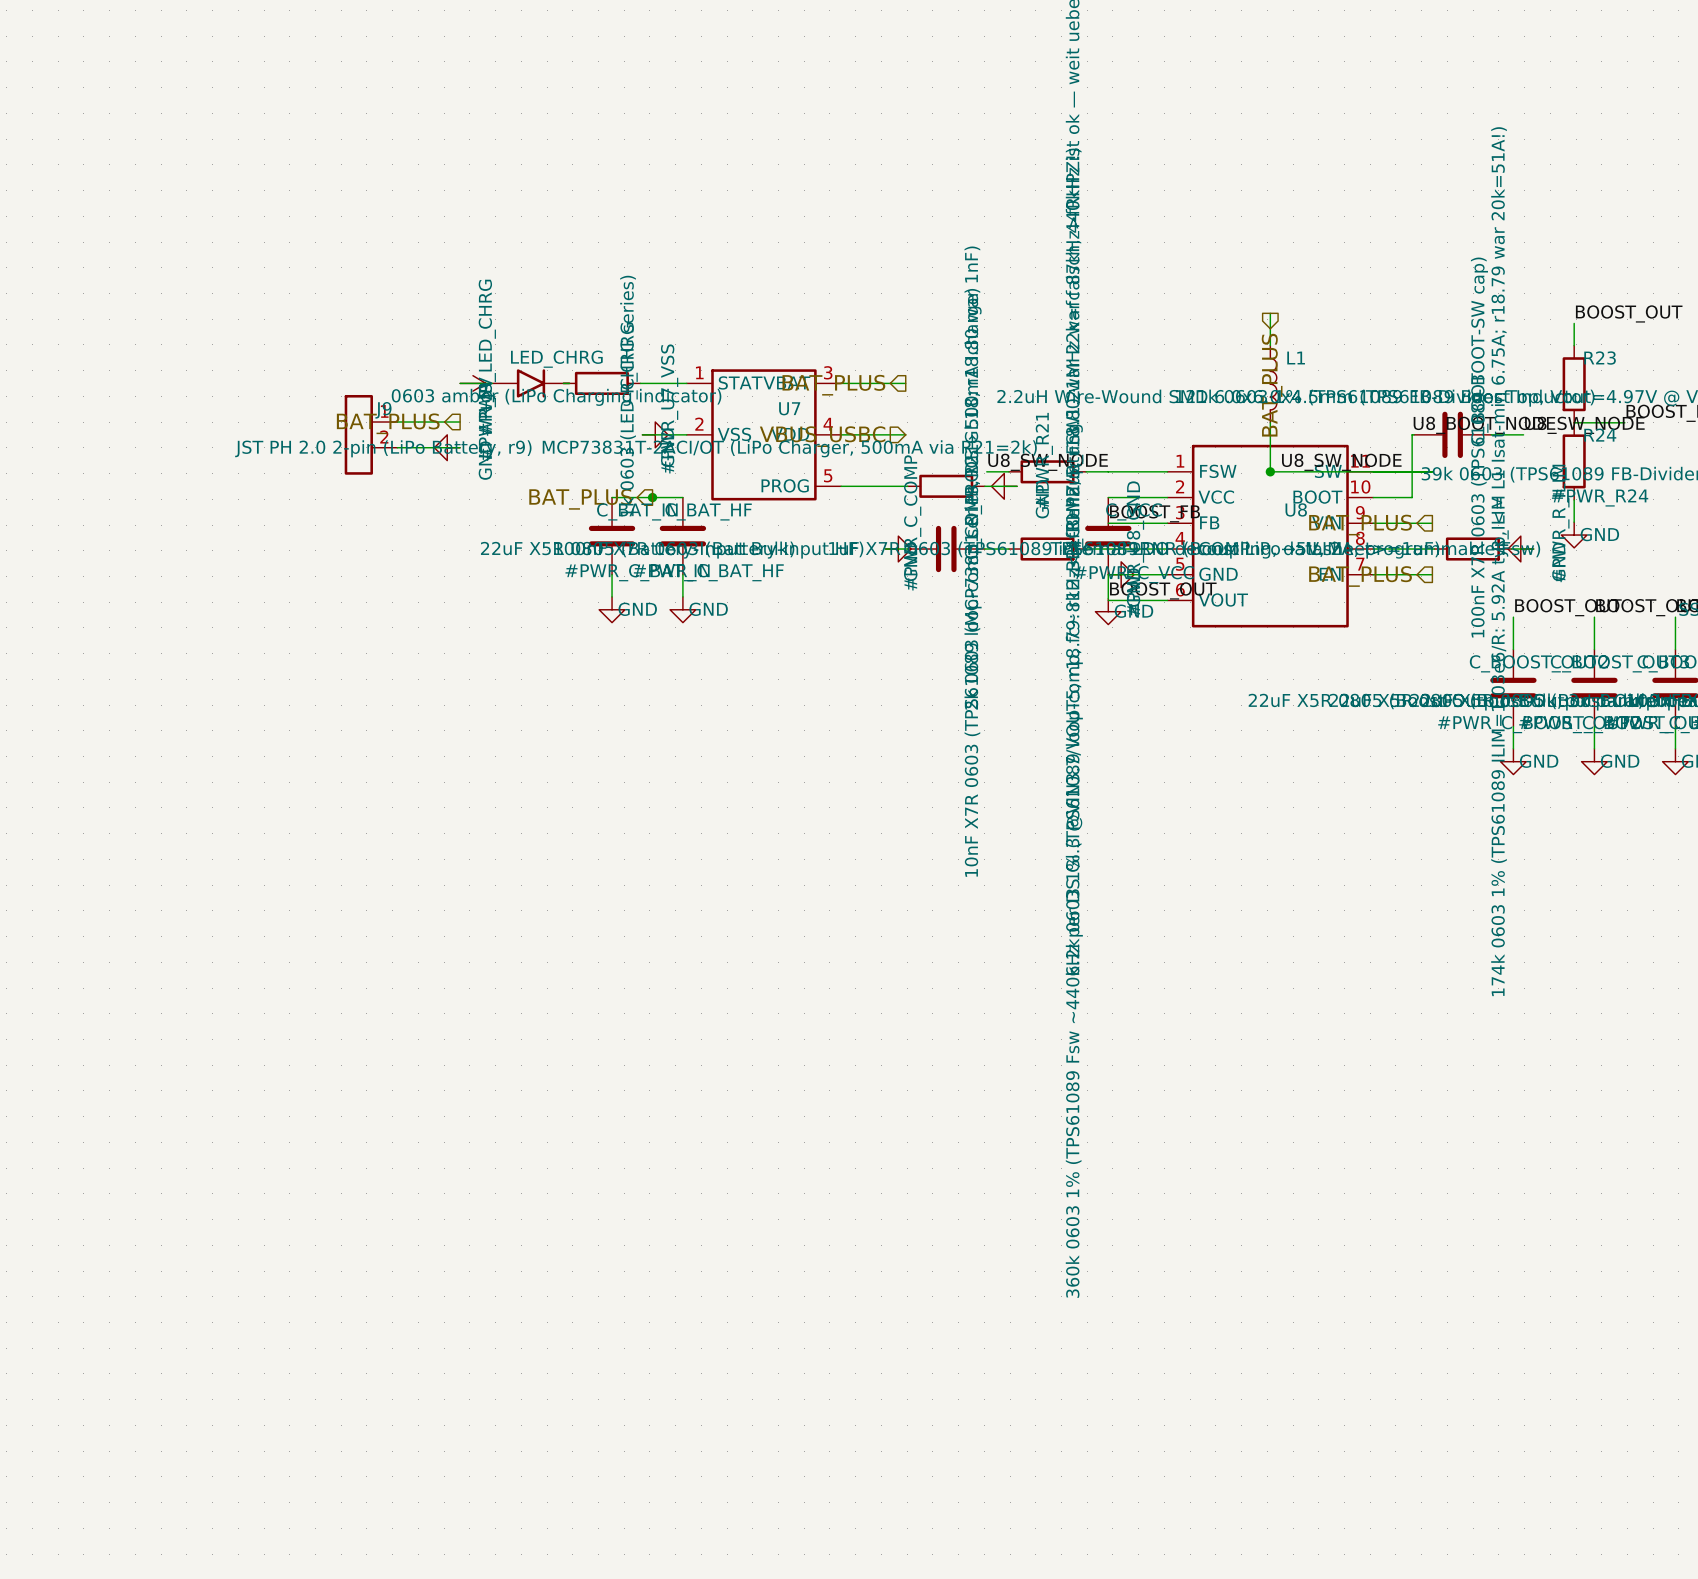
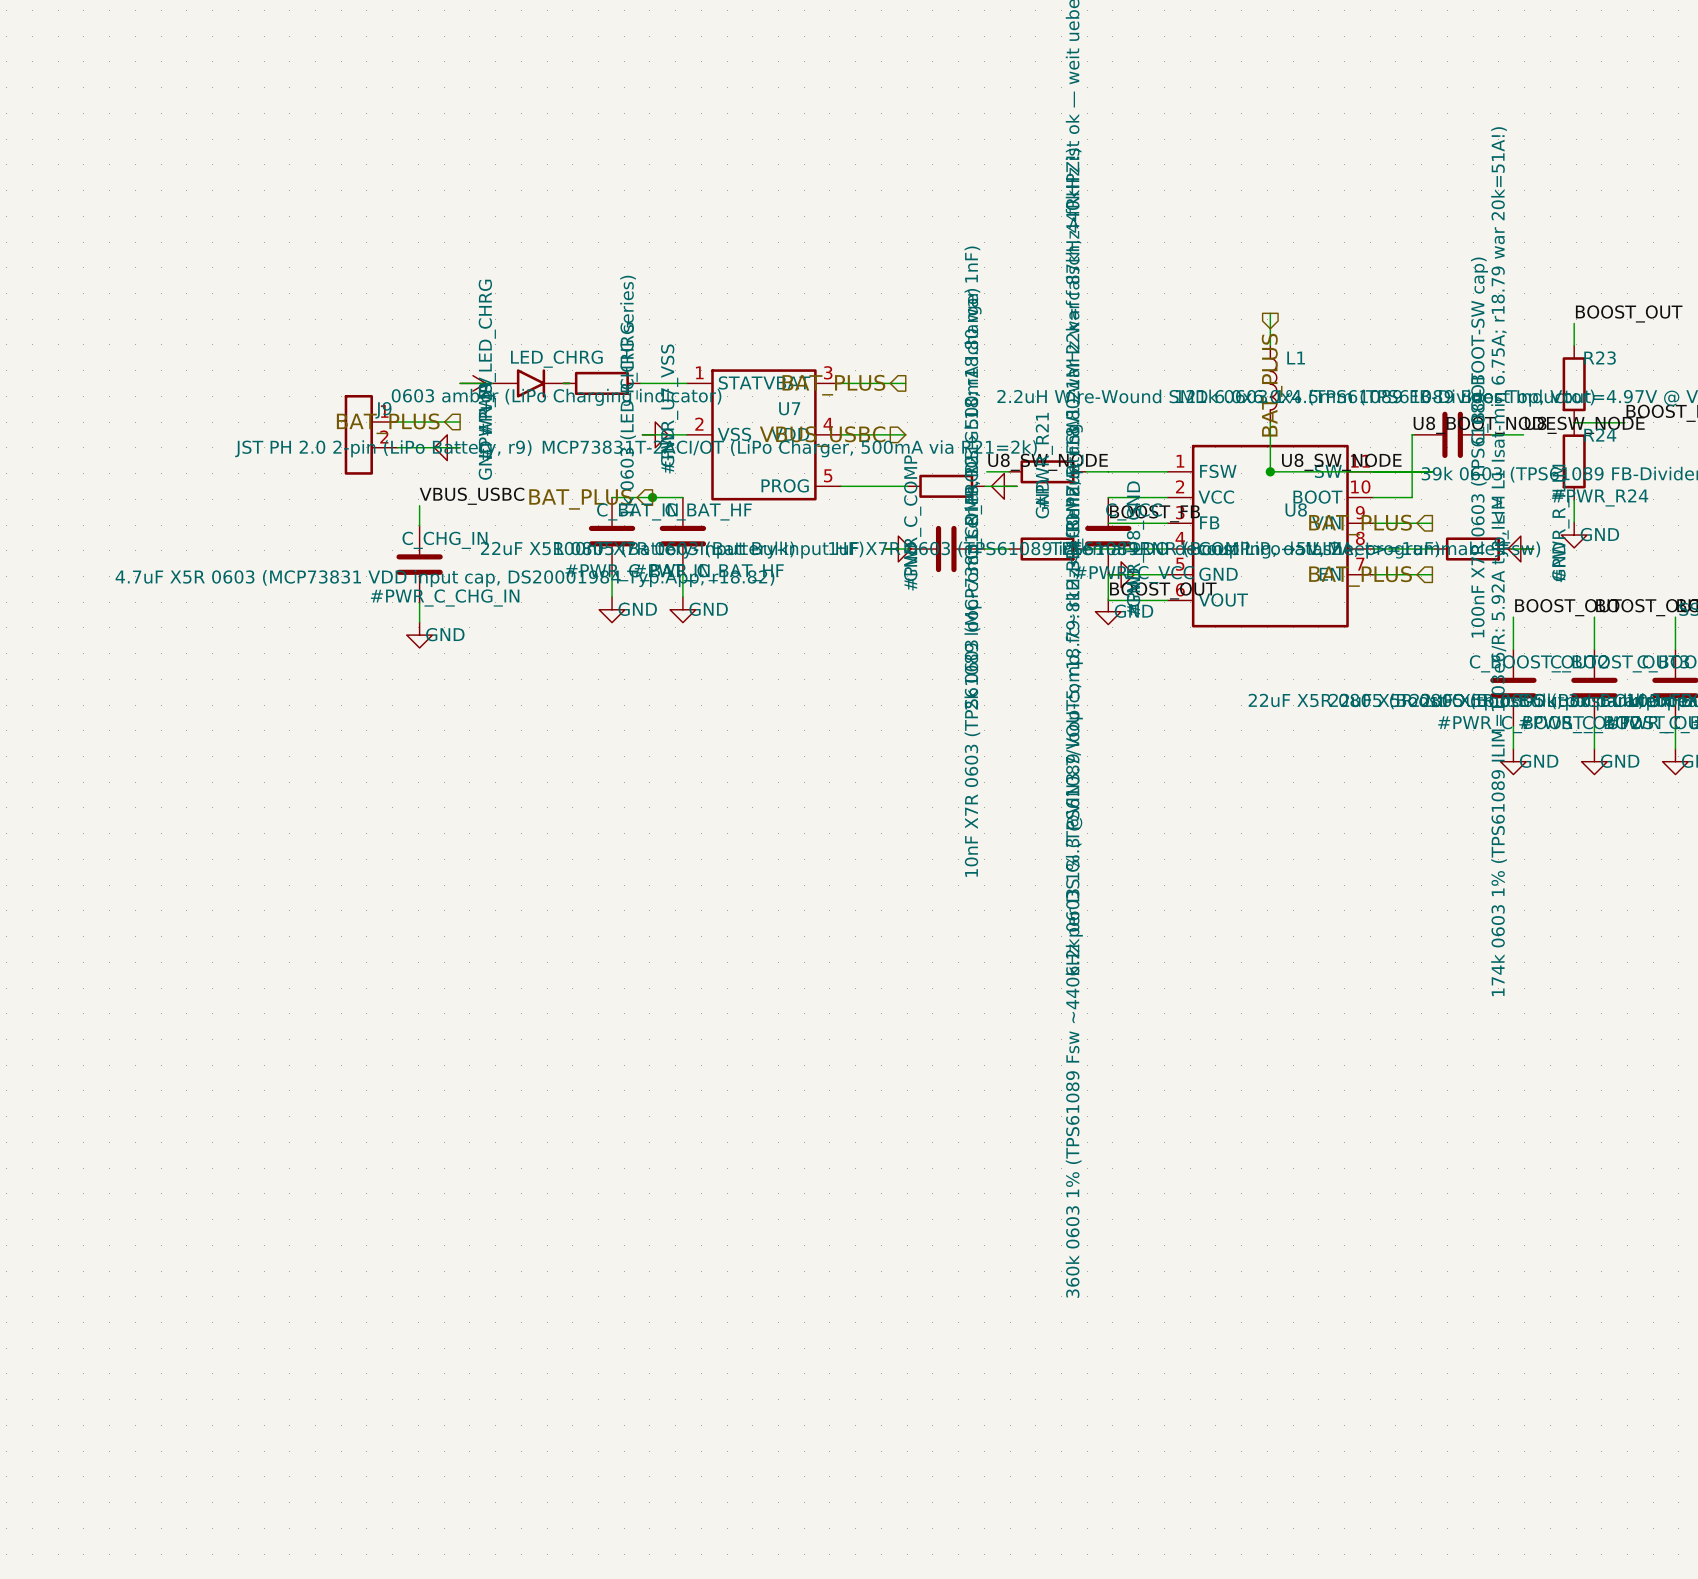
label: none -> VBUS_USBC (472, 496)
wire: none -> (419, 505) (419, 526)
C_CHG_IN: none -> 4.7uF X5R 0603 (MCP73831 VDD input cap, DS20001984 Typ.App; r18.82) (419, 564)
wire: none -> (419, 603) (419, 622)
#PWR_C_CHG_IN: none -> GND (419, 635)

